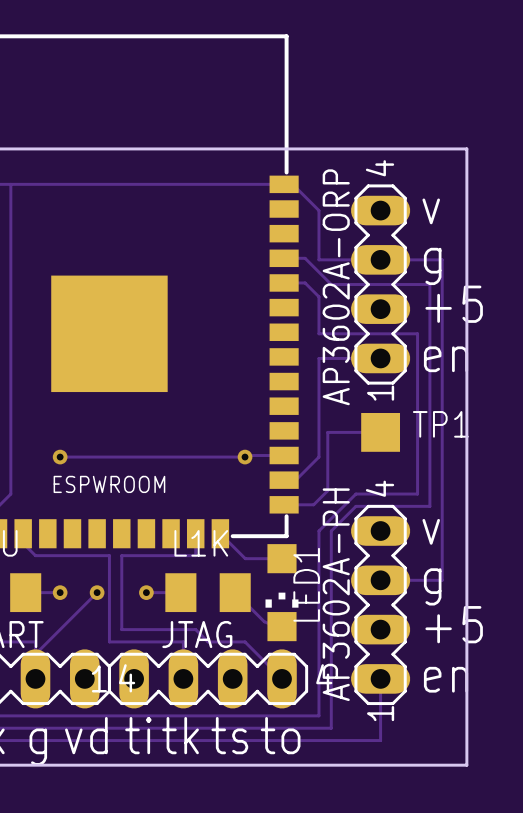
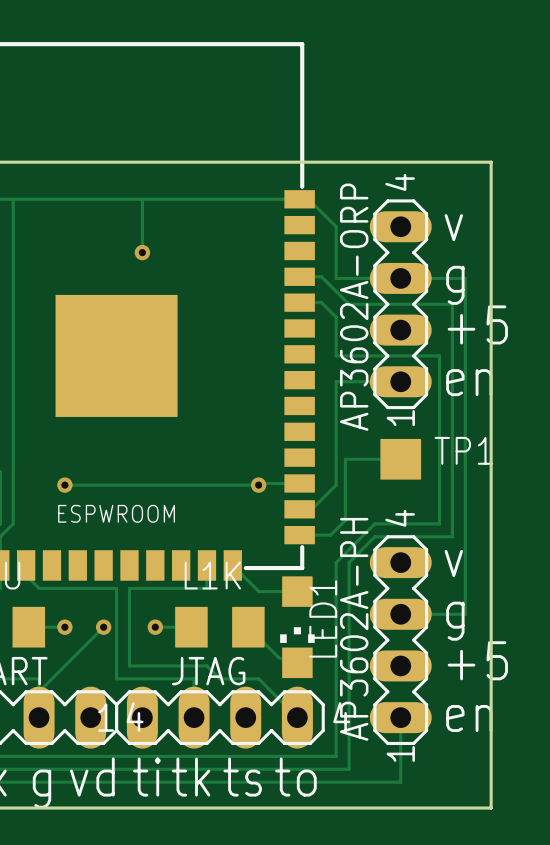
track: none -> (142, 199) (142, 252)
via: none -> (142, 252)

